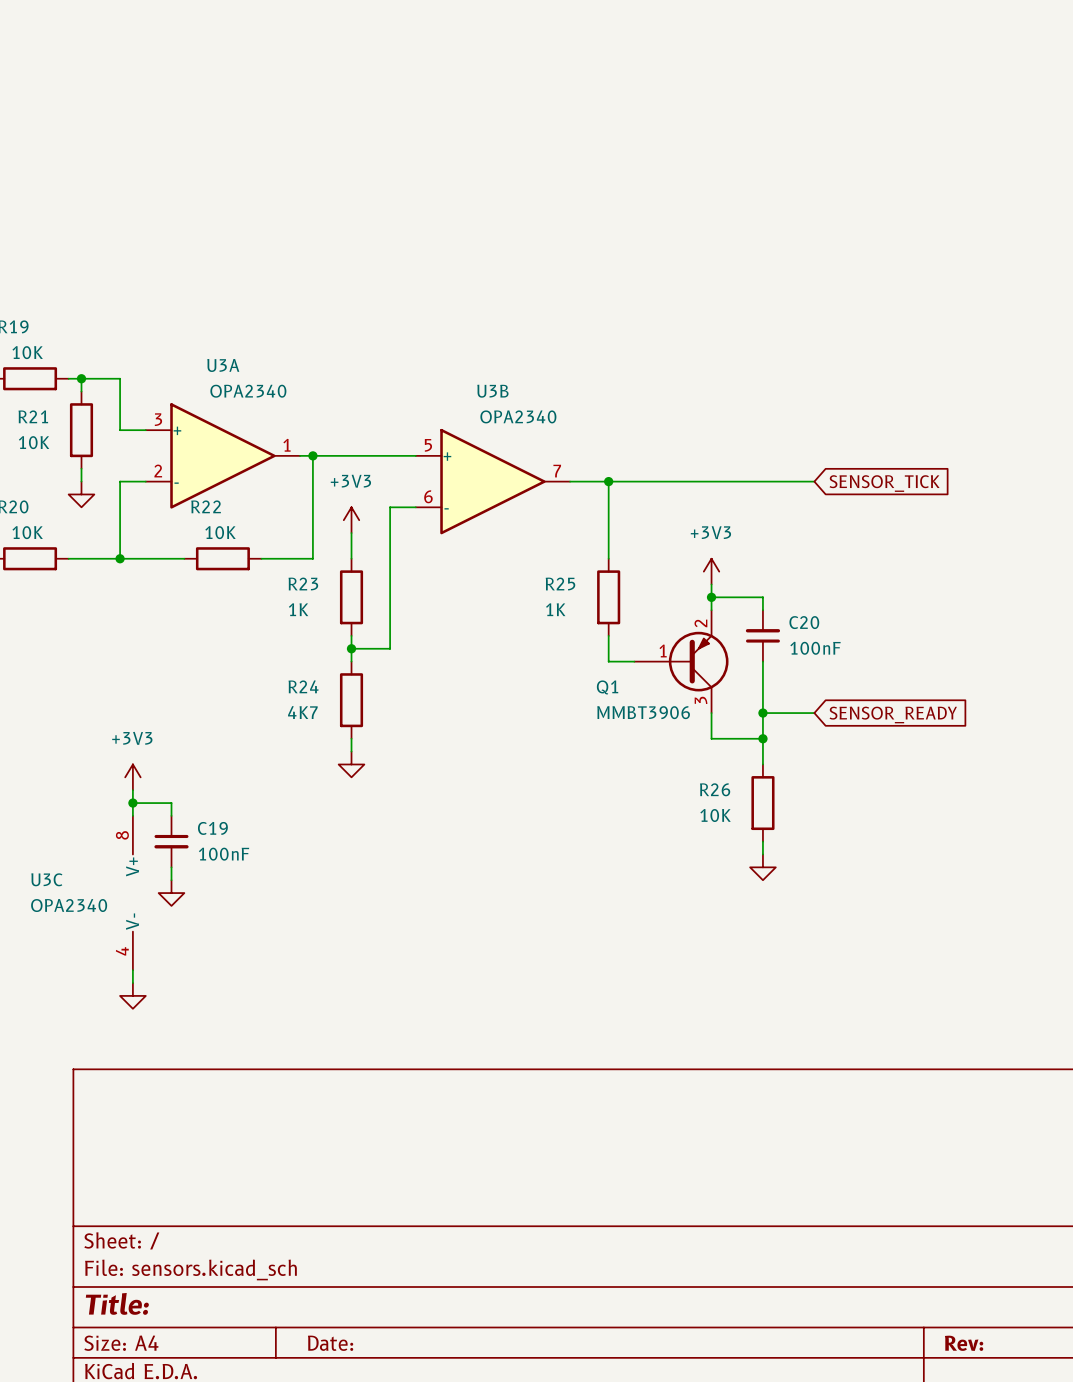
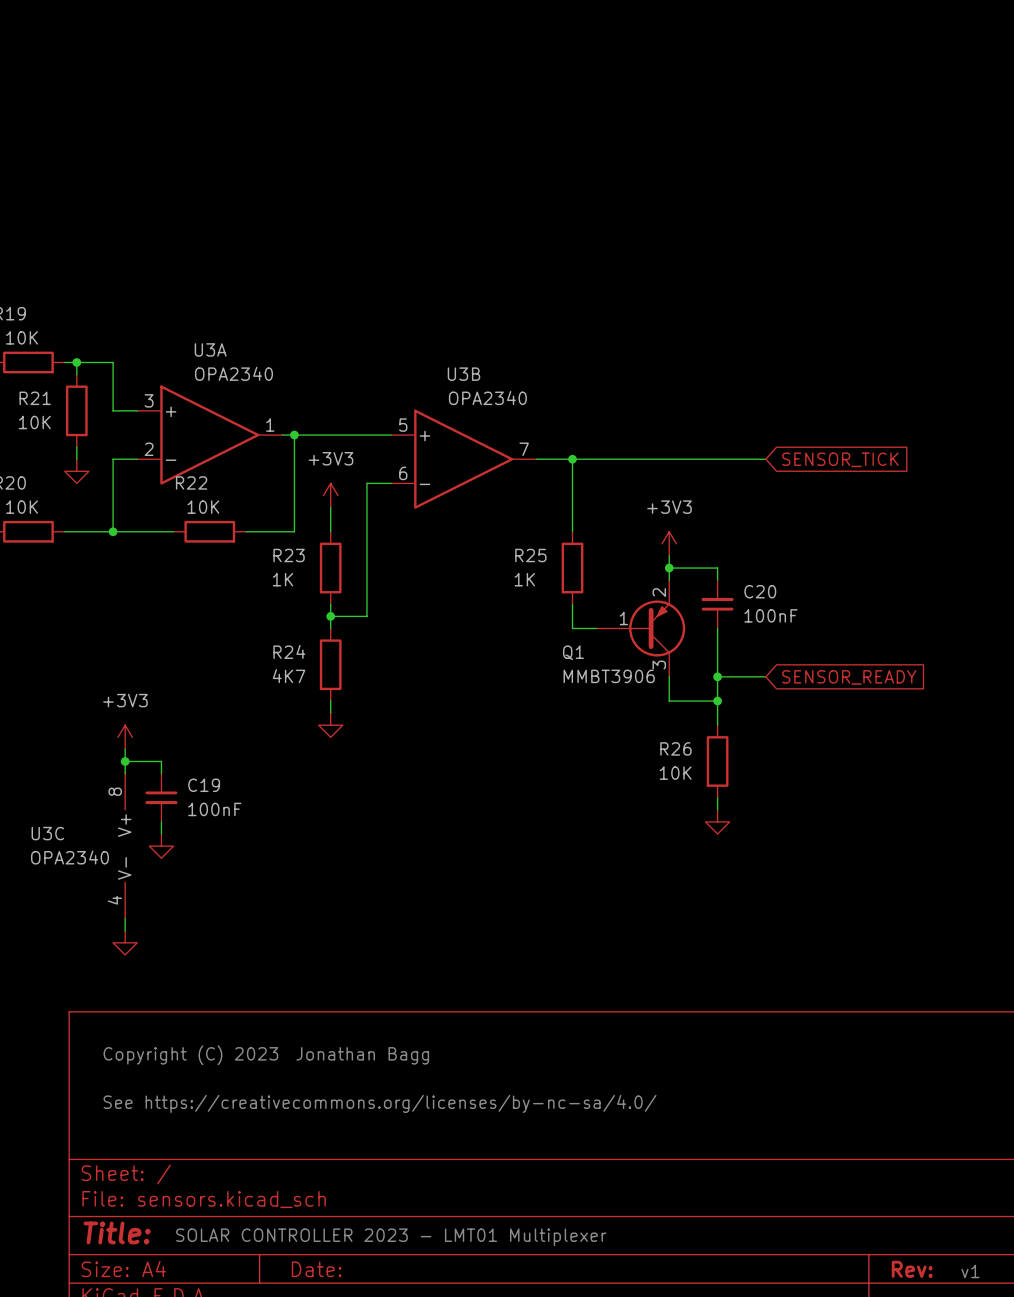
text: none -> Copyright (C) 2023 (190, 1055)
text: none -> Jonathan Bagg (362, 1055)
text: none -> See https://creativecommons.org/licenses/by-nc-sa/4.0/ (380, 1103)
text: none -> SOLAR CONTROLLER 2023 - LMT01 Multiplexer (391, 1237)
text: none -> v1 (970, 1271)

